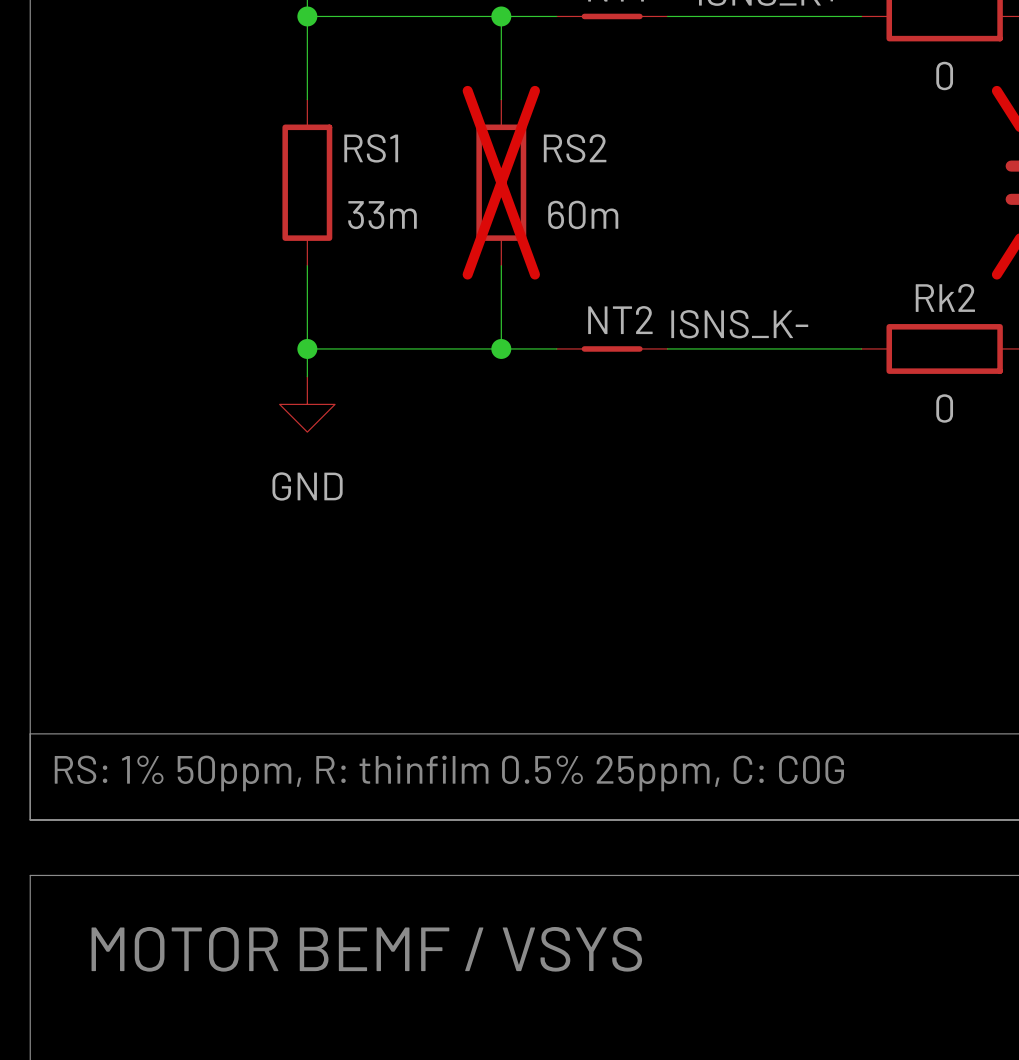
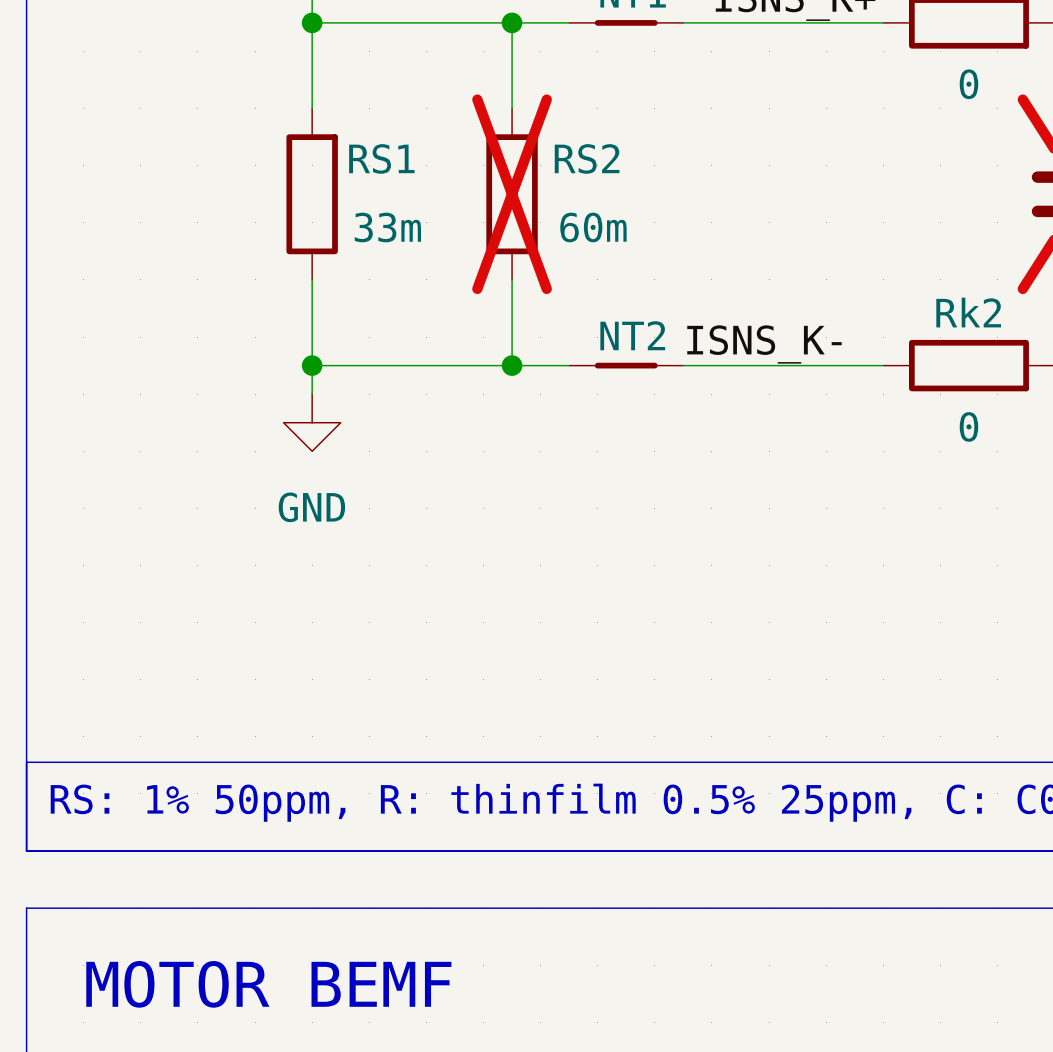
text: MOTOR BEMF / VSYS (366, 949) -> MOTOR BEMF (268, 984)

